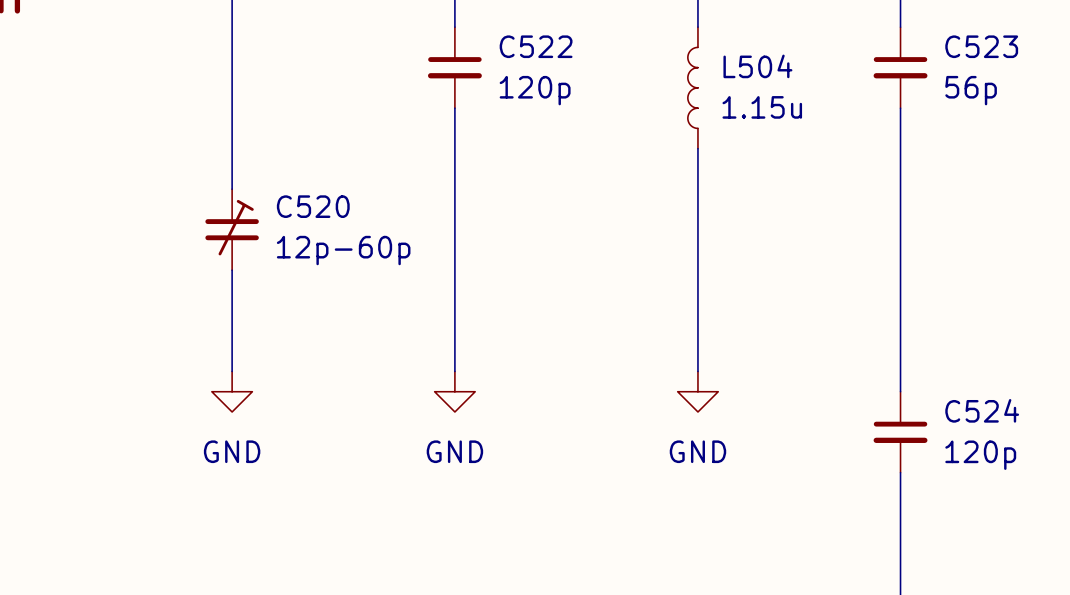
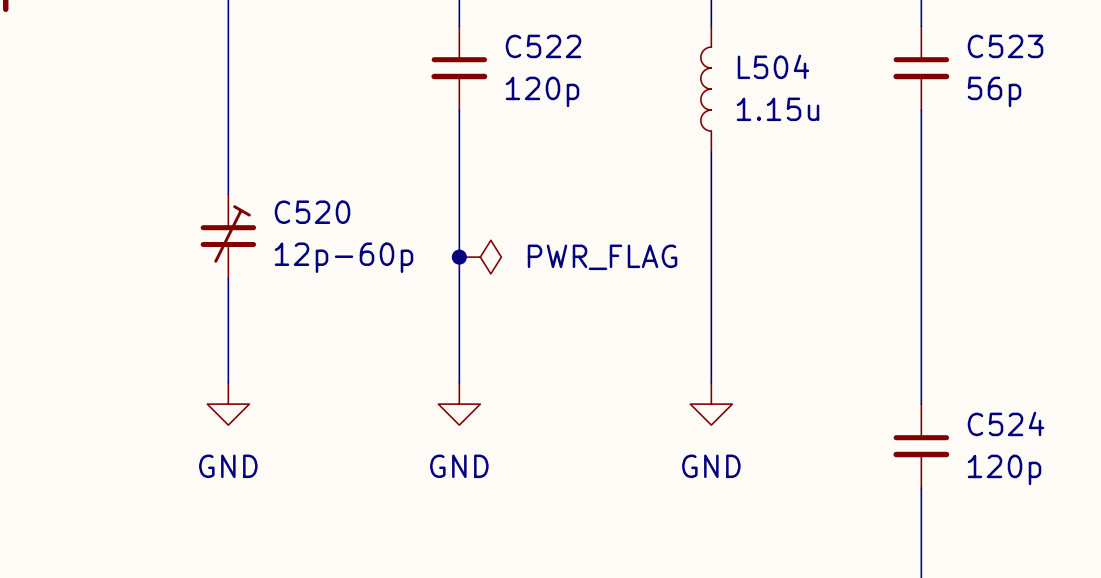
junction: none -> (459, 257)
power symbol: none -> PWR_FLAG (480, 257)

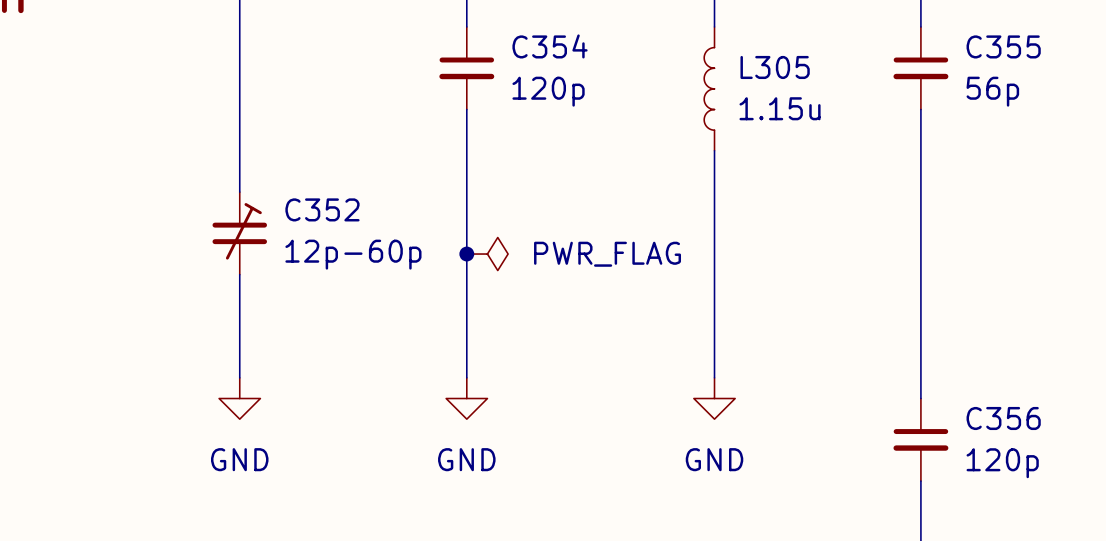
C522 name: C522 (543, 46) -> C354 (550, 46)
C523 name: C523 (1005, 46) -> C355 (1003, 46)
L504 name: L504 (773, 66) -> L305 (775, 67)
C520 name: C520 (312, 212) -> C352 (322, 209)
C524 name: C524 (1006, 423) -> C356 (1003, 418)

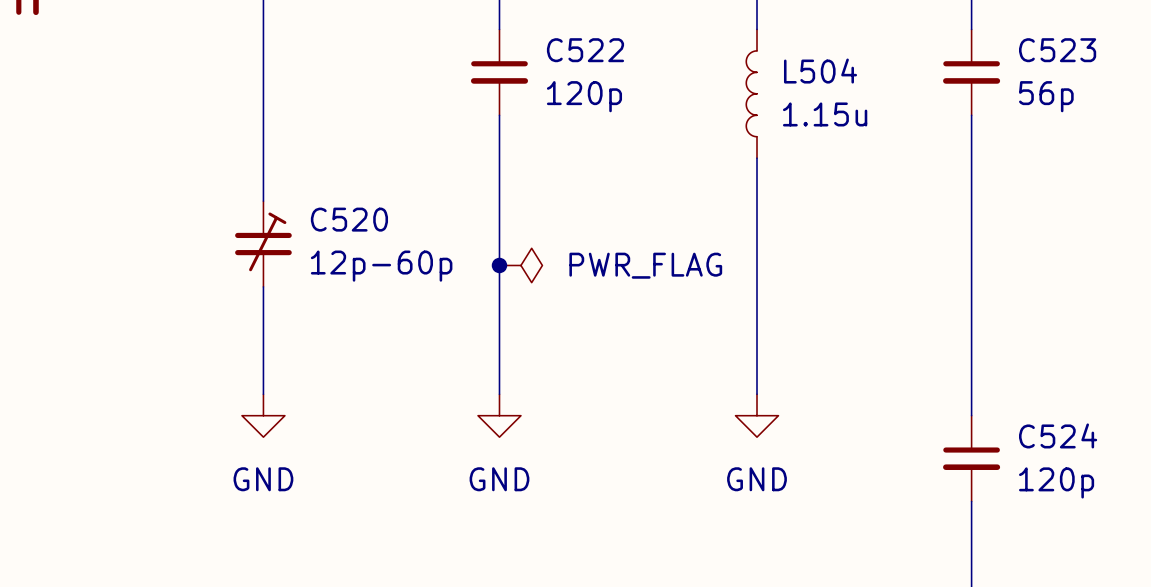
C354 name: C354 (550, 46) -> C522 (585, 50)
C355 name: C355 (1003, 46) -> C523 (1057, 50)
L305 name: L305 (775, 67) -> L504 (820, 71)
C352 name: C352 (322, 209) -> C520 (349, 219)
C356 name: C356 (1003, 418) -> C524 (1058, 435)

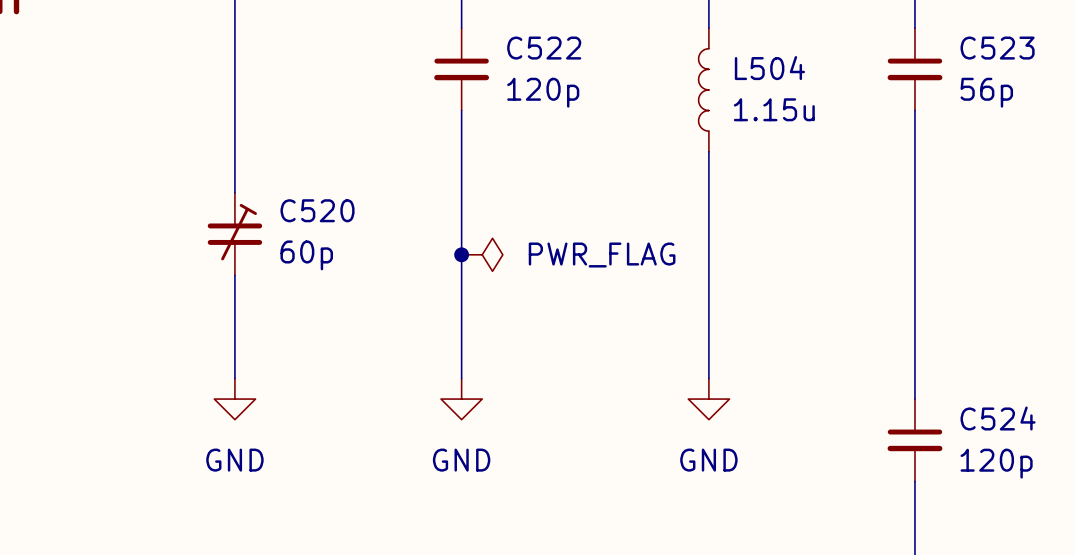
C520 value: 12p-60p (381, 266) -> 60p (306, 255)

